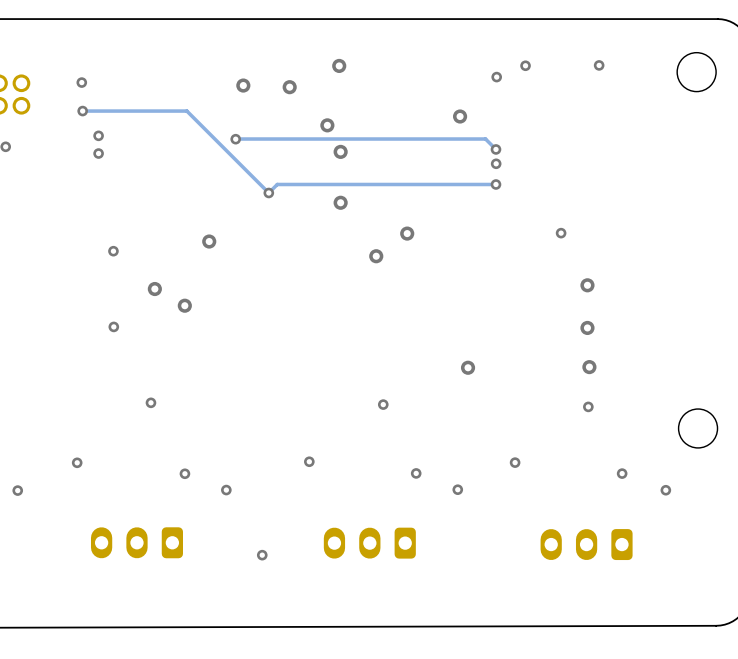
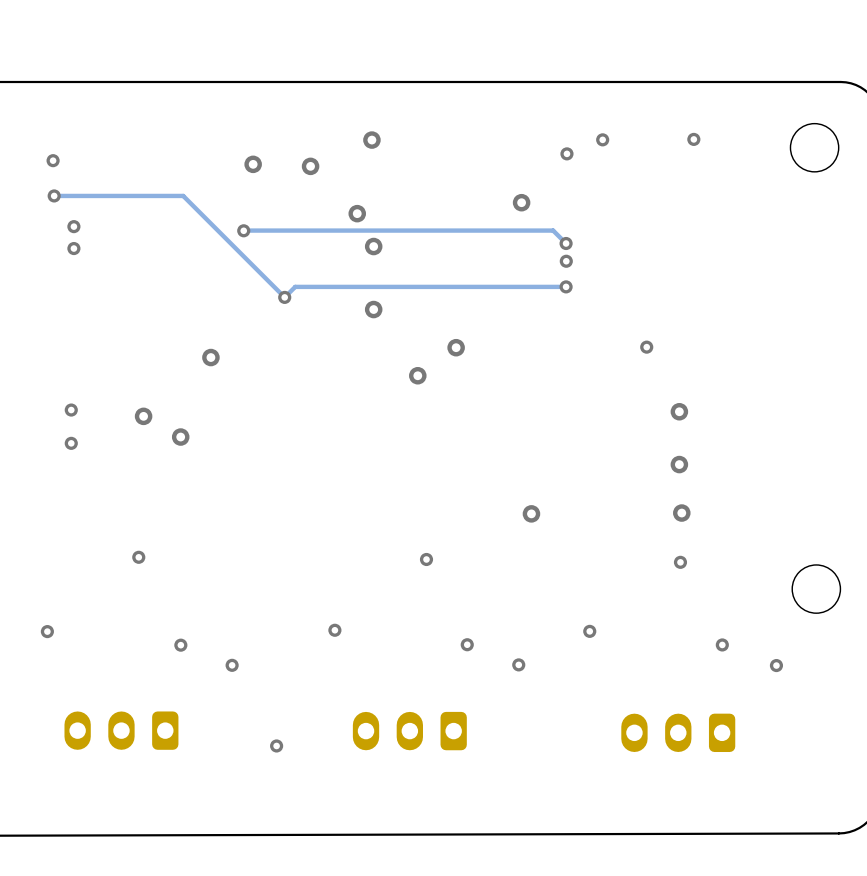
via: (113, 251) -> none
via: none -> (71, 410)
via: none -> (71, 443)
via: (113, 326) -> none

